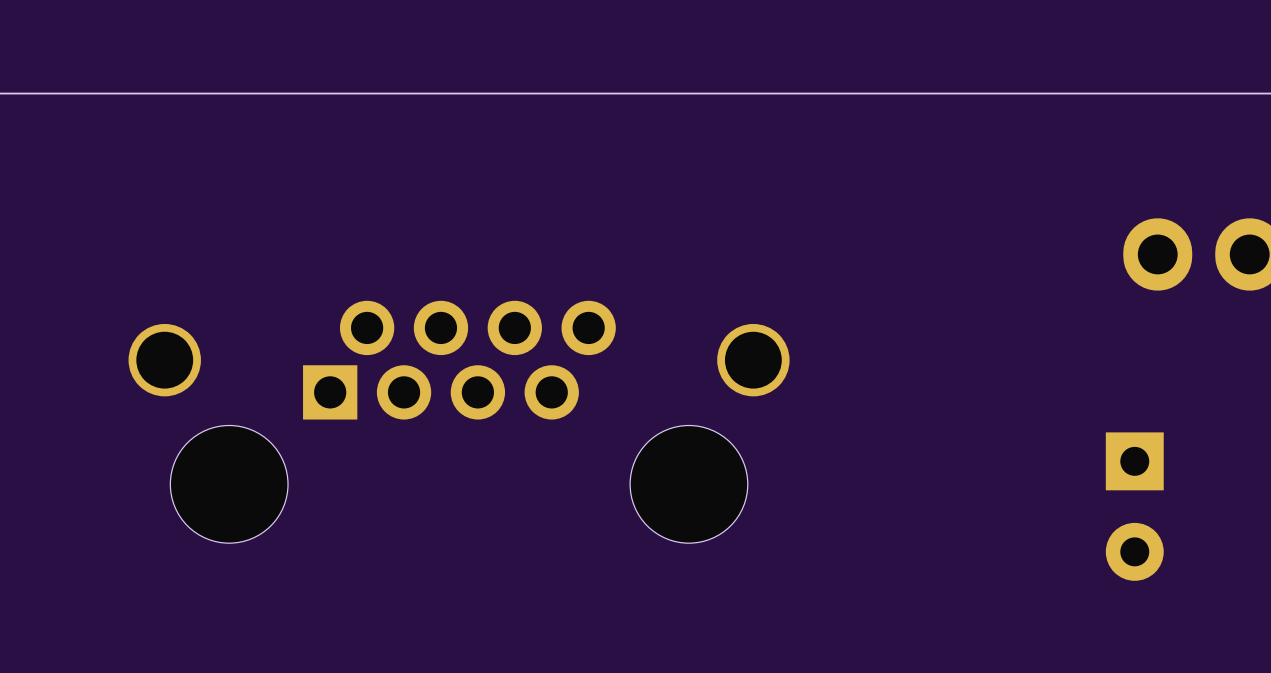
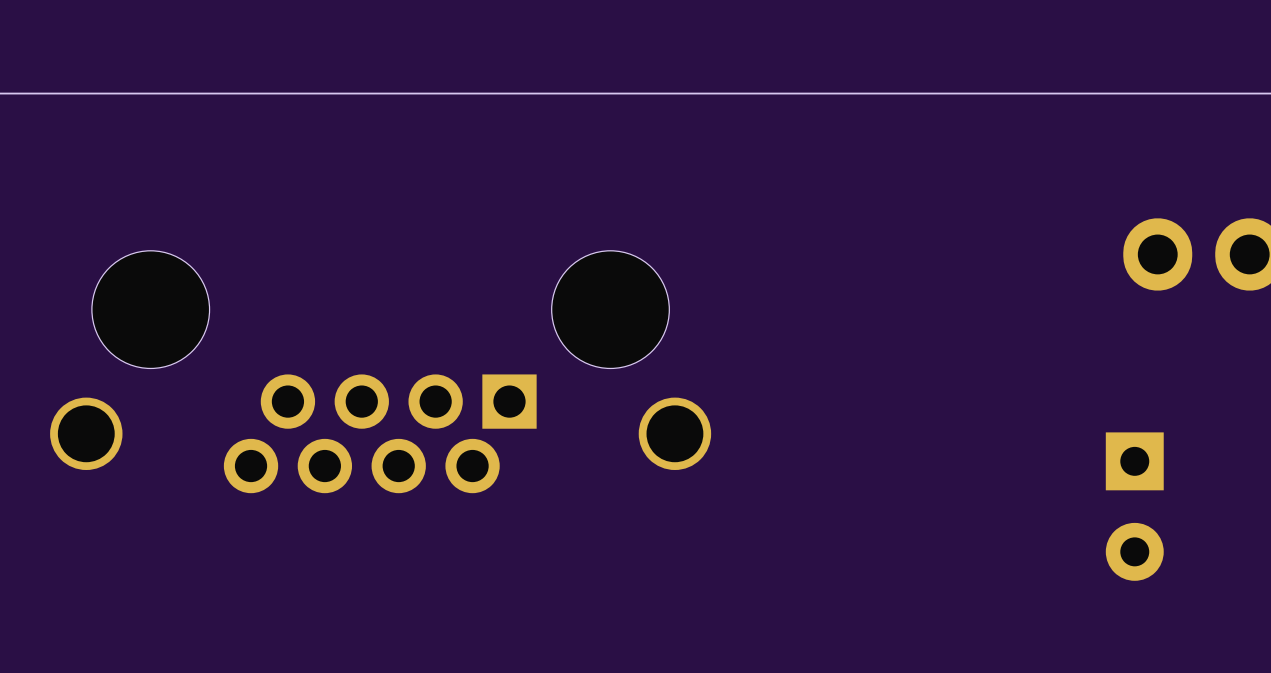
part rotation: 0° (459, 421) -> 180° (380, 371)

